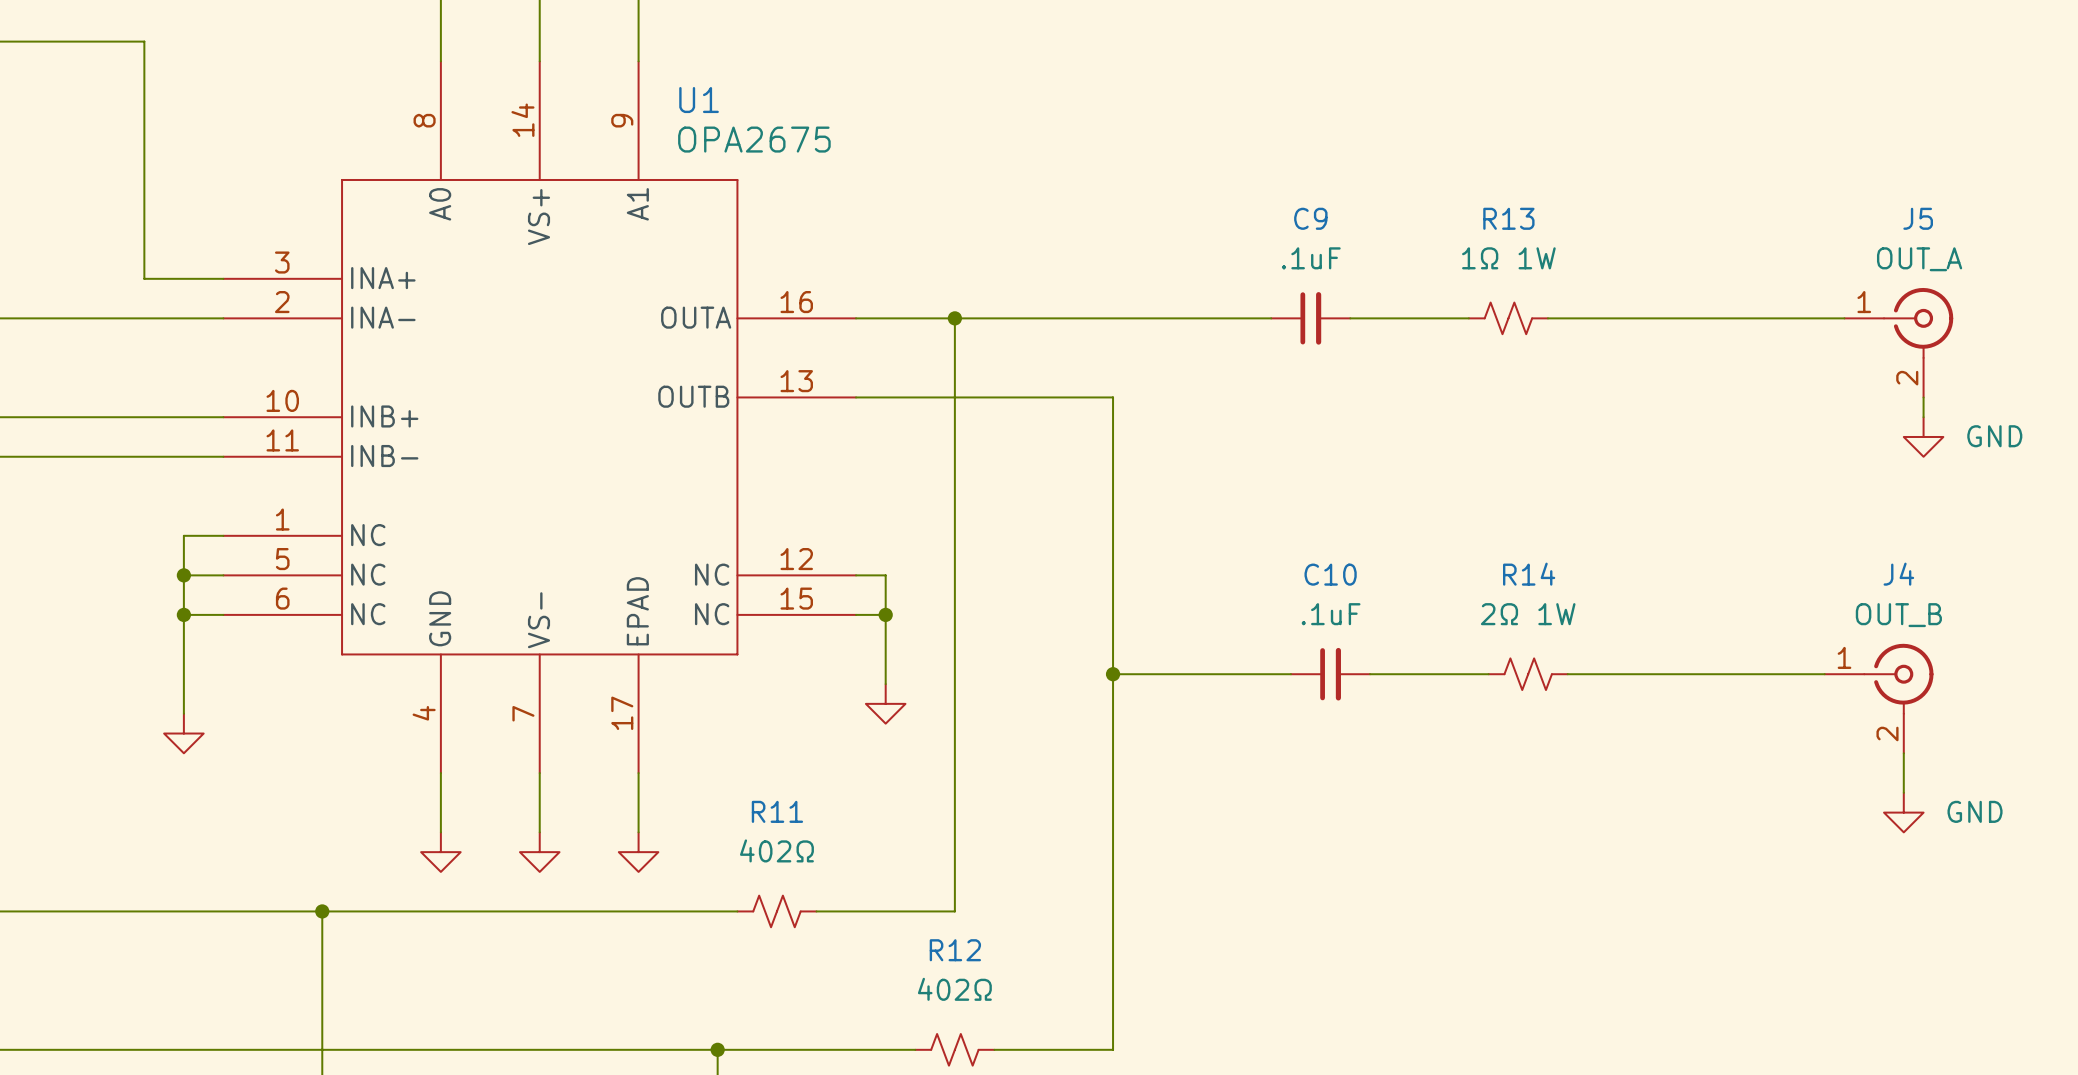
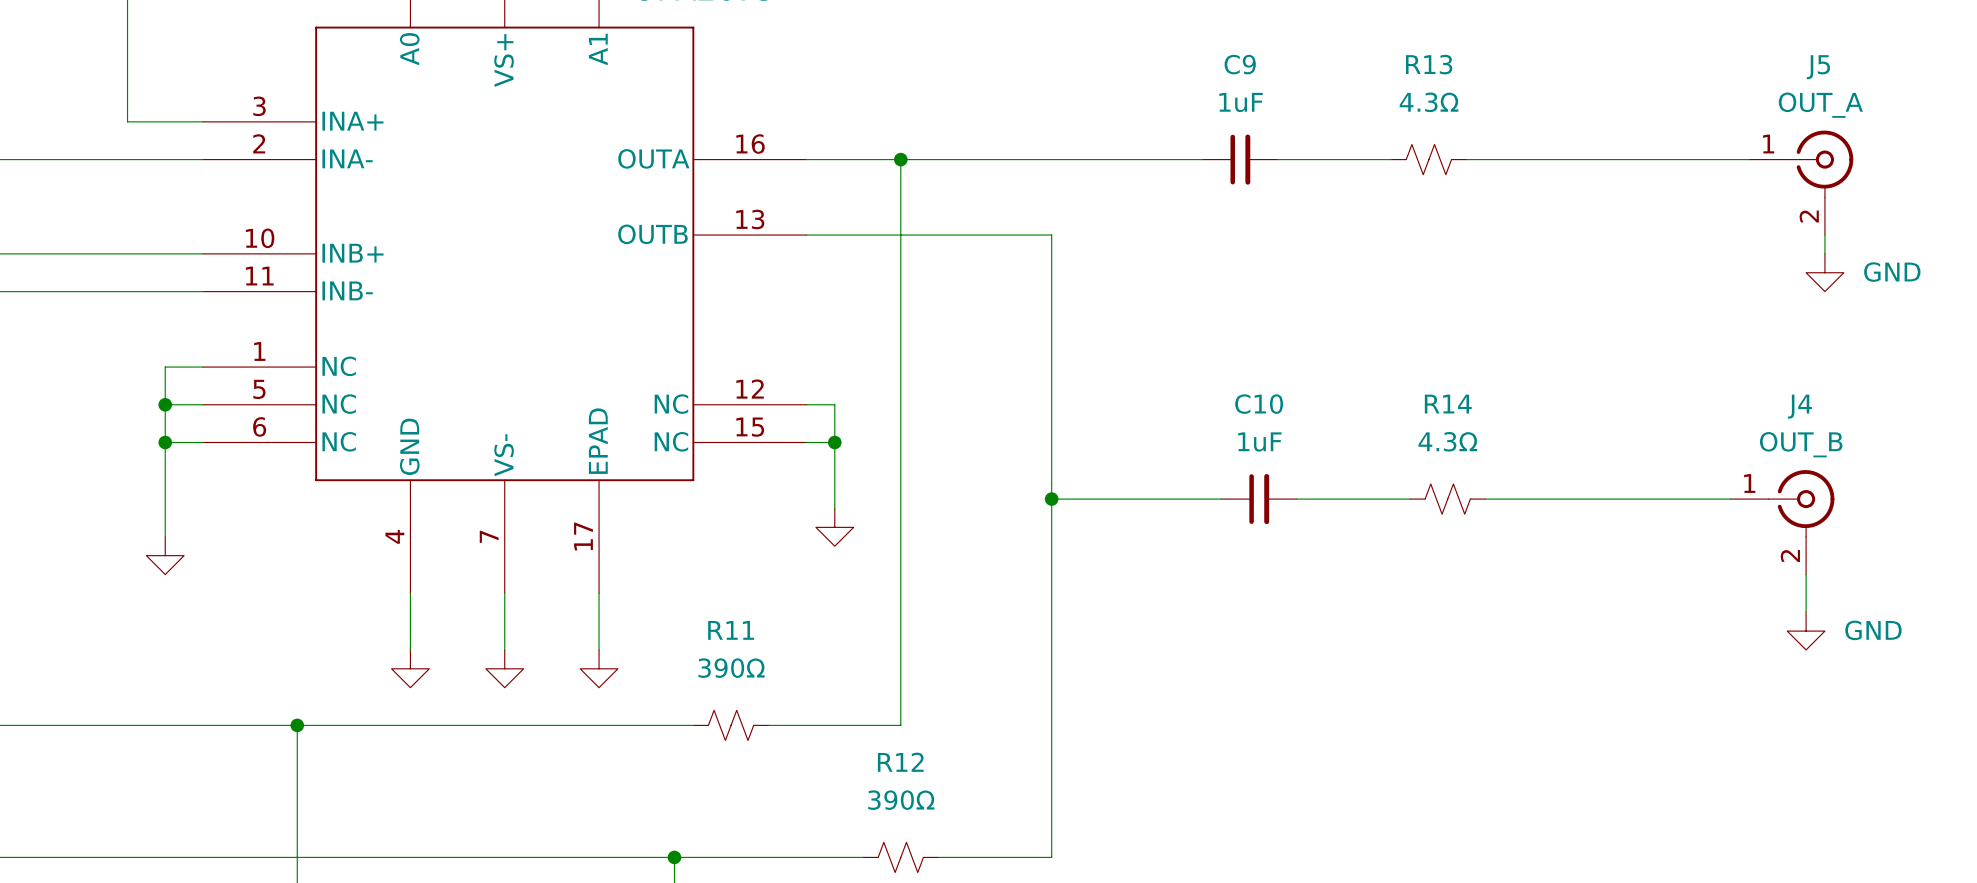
C9 value: .1uF (1311, 258) -> 1uF (1241, 102)
R13 value: 1Ω 1W (1508, 258) -> 4.3Ω (1429, 102)
C10 value: .1uF (1331, 614) -> 1uF (1259, 441)
R14 value: 2Ω 1W (1528, 614) -> 4.3Ω (1447, 441)
R11 value: 402Ω (776, 850) -> 390Ω (731, 668)
R12 value: 402Ω (954, 989) -> 390Ω (901, 800)

